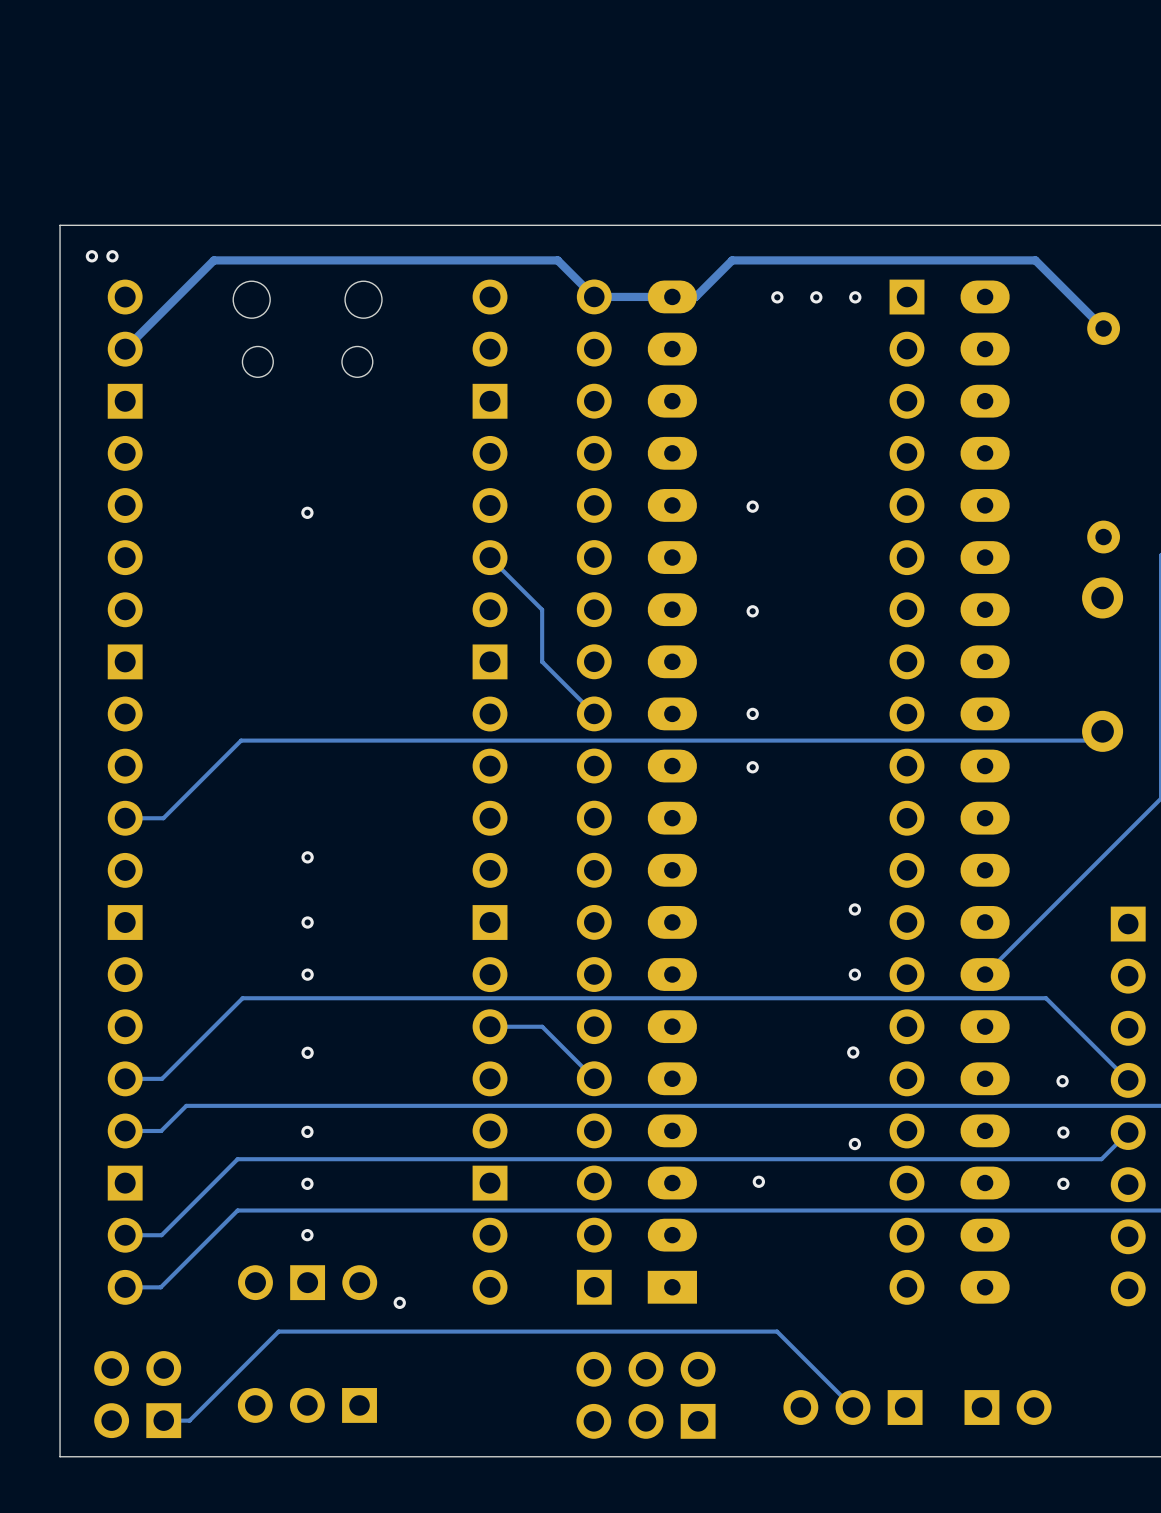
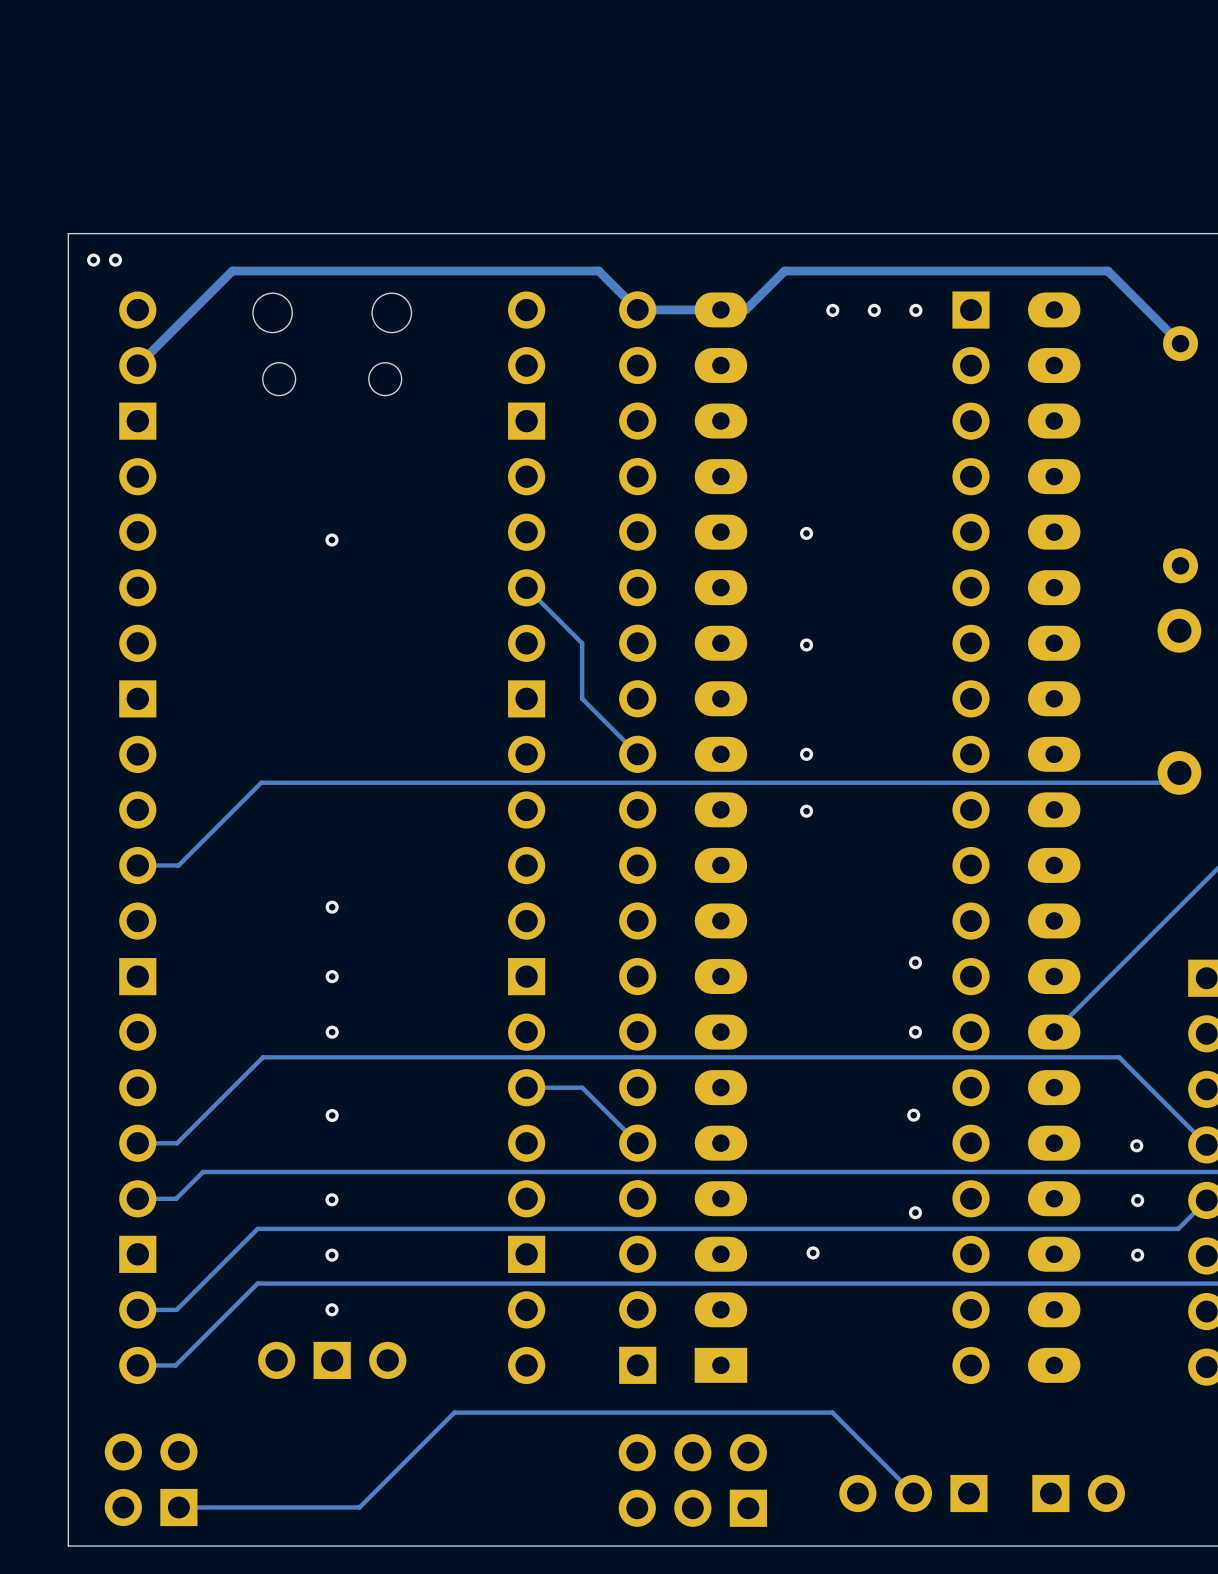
via: none -> (93, 260)
via: none -> (115, 260)
via: (91, 256) -> none
via: (112, 256) -> none
via: (399, 1302) -> none
track: (422, 1331) (278, 1331) (189, 1420) -> (454, 1412) (359, 1507) (206, 1507)
part: (307, 1405) -> none

